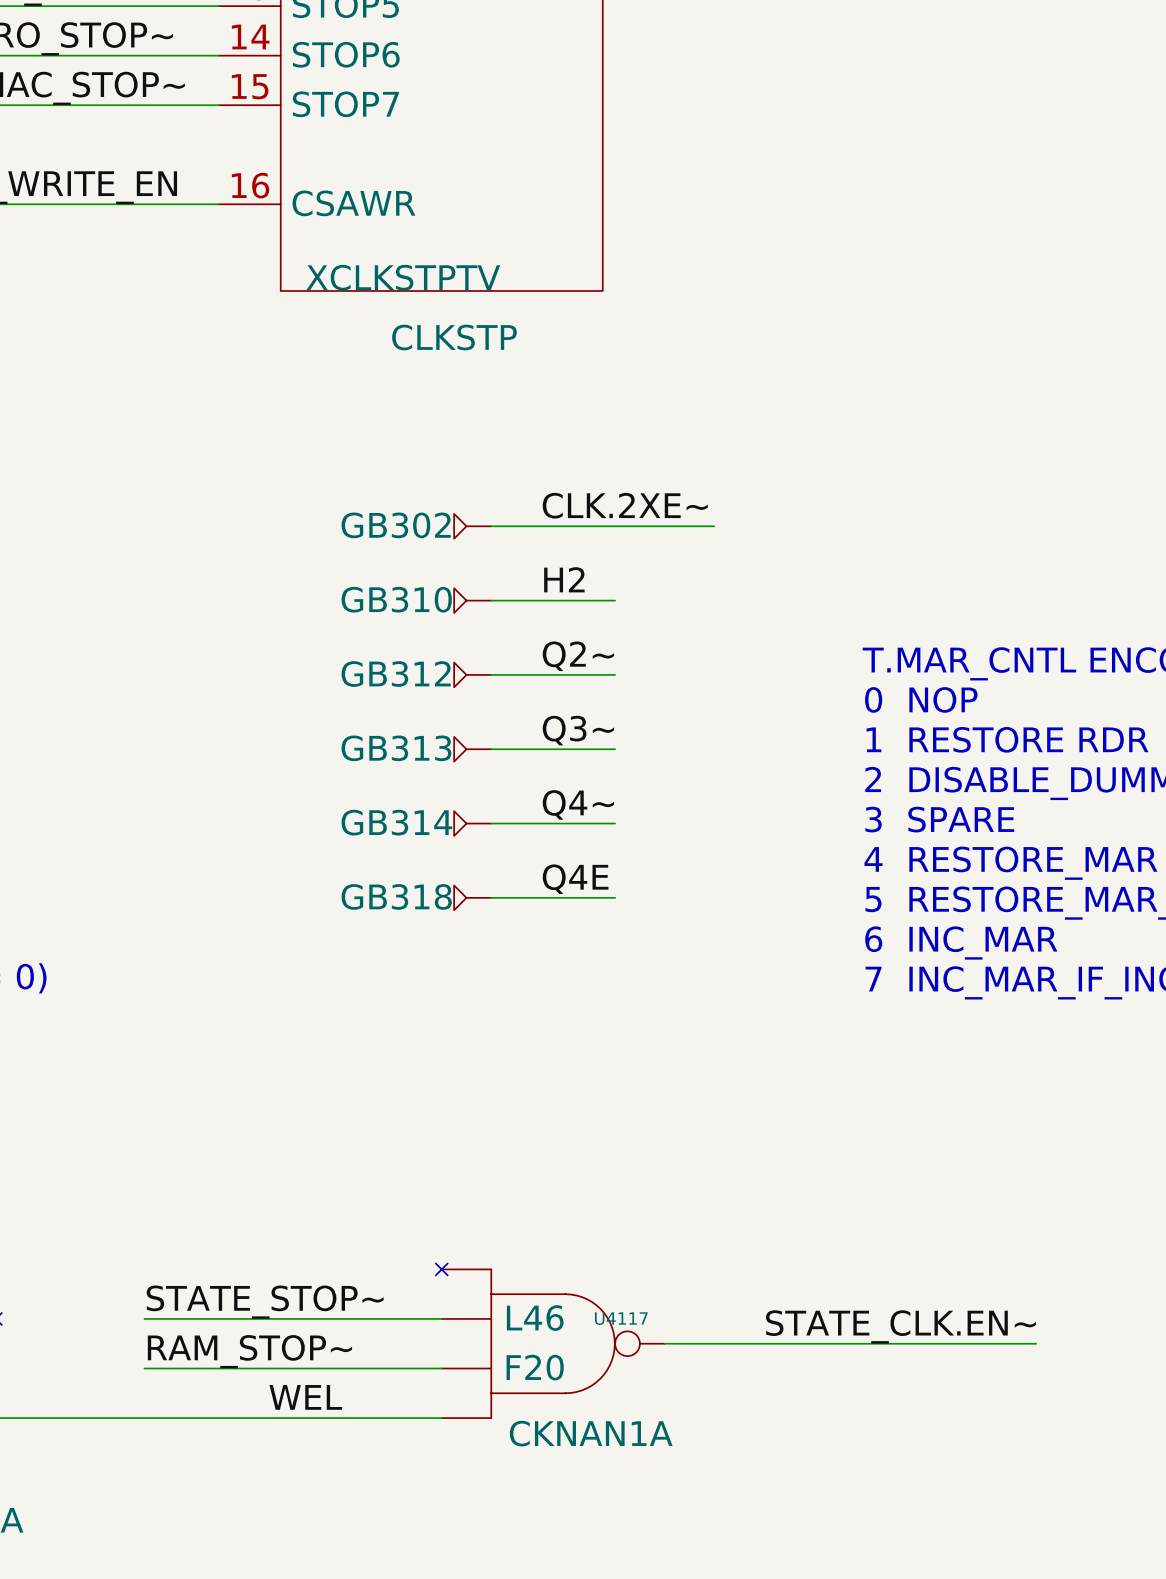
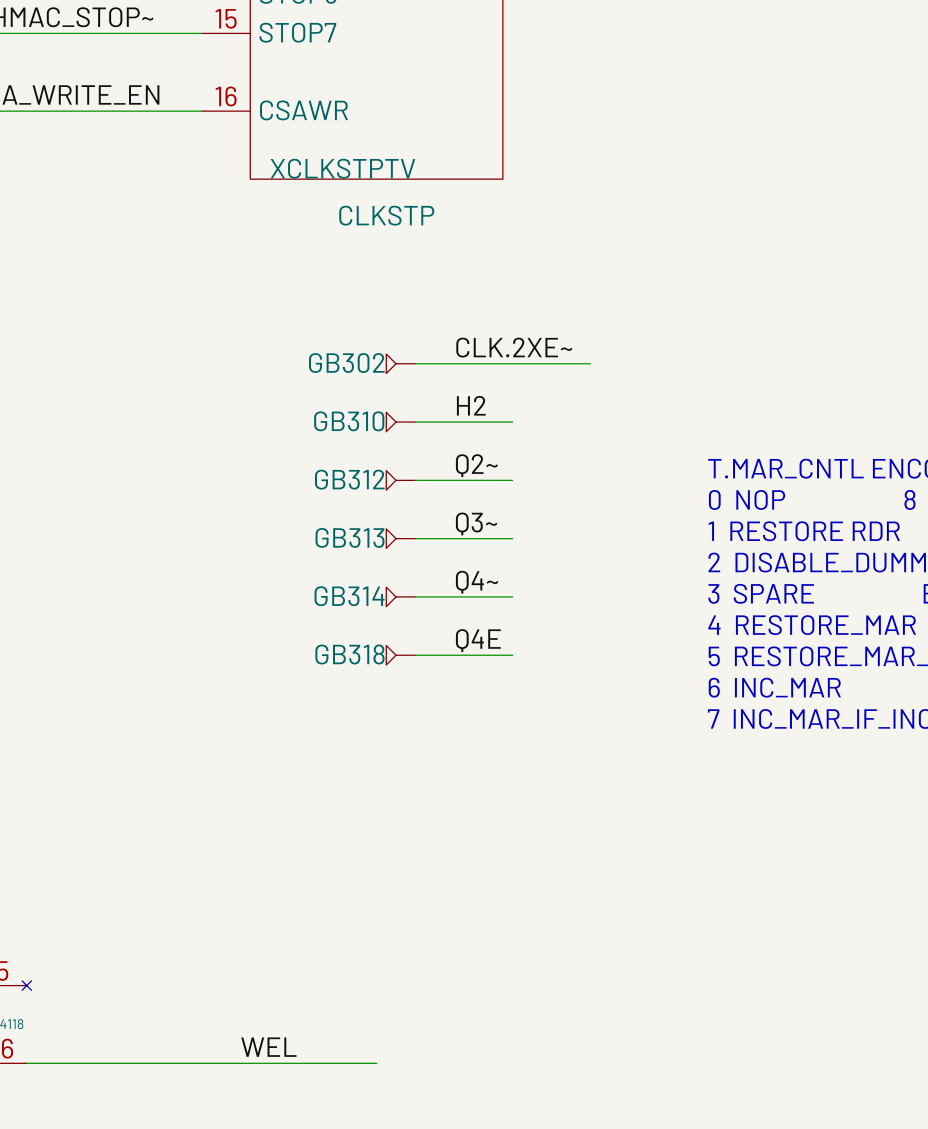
no-connect mark: (441, 1269) -> none
label: STATE_STOP~ (265, 1302) -> none
wire: (144, 1318) (441, 1318) -> none
label: STATE_CLK.EN~ (901, 1326) -> none
U4117: F20 (553, 1343) -> none
wire: (664, 1343) (1036, 1343) -> none
label: RAM_STOP~ (249, 1351) -> none
wire: (144, 1368) (441, 1368) -> none

